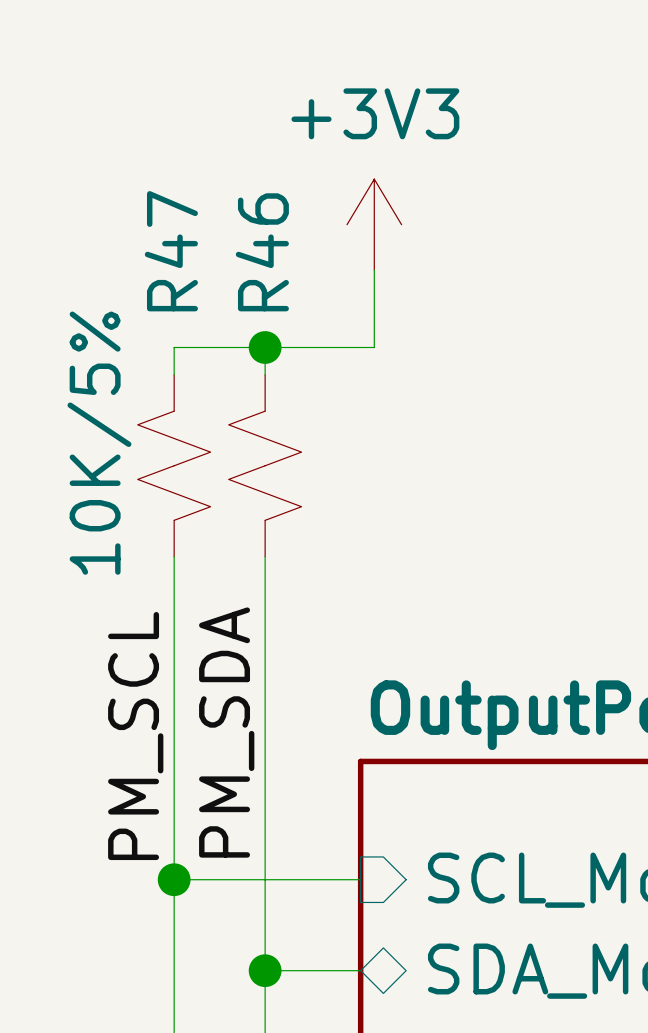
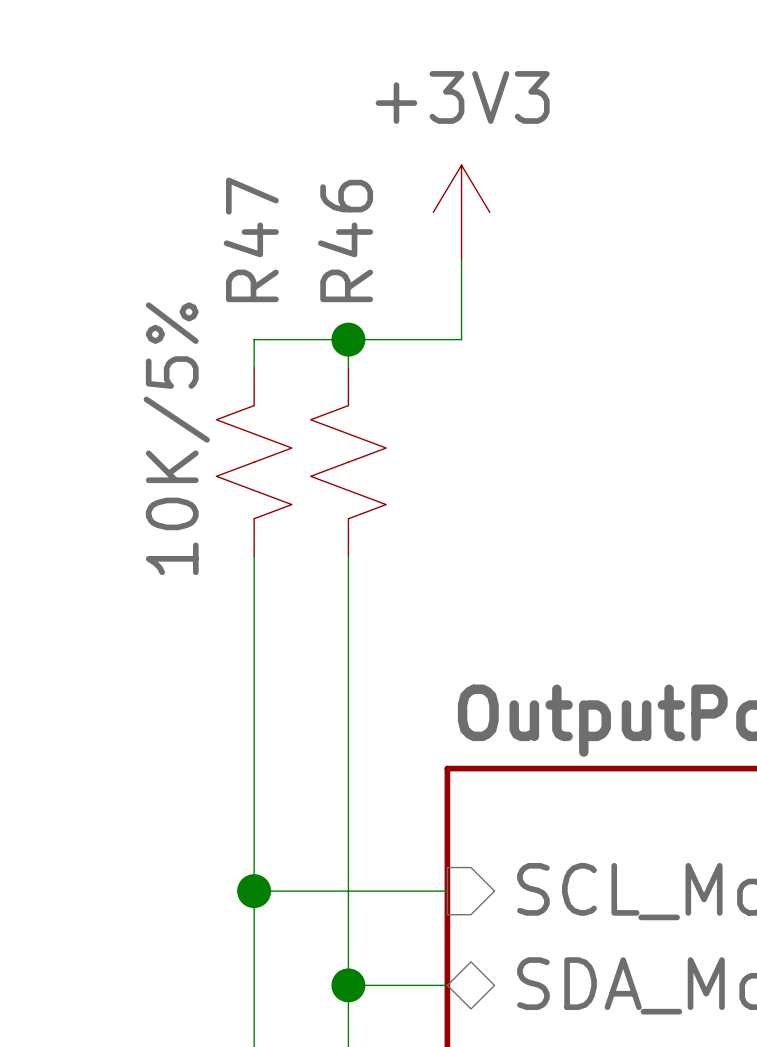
label: PM_SDA (226, 732) -> none
label: PM_SCL (135, 736) -> none

